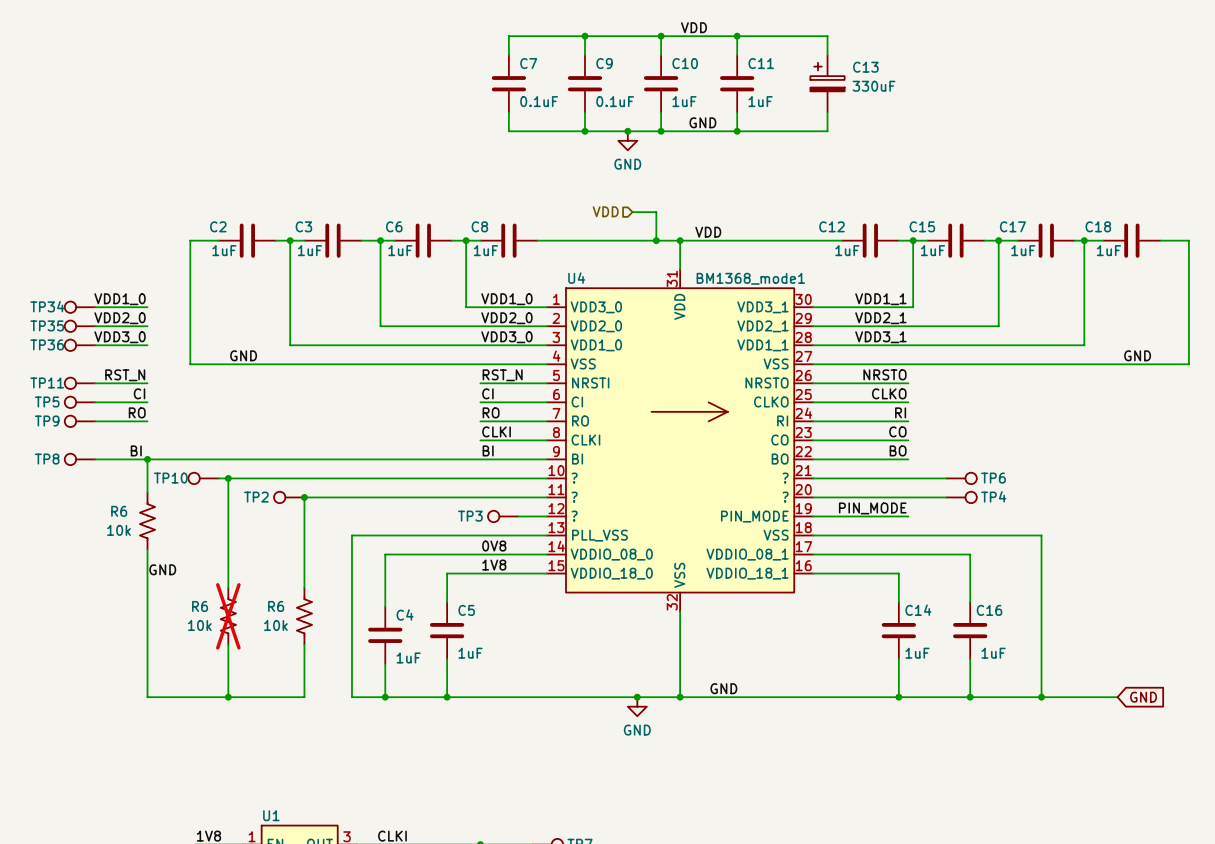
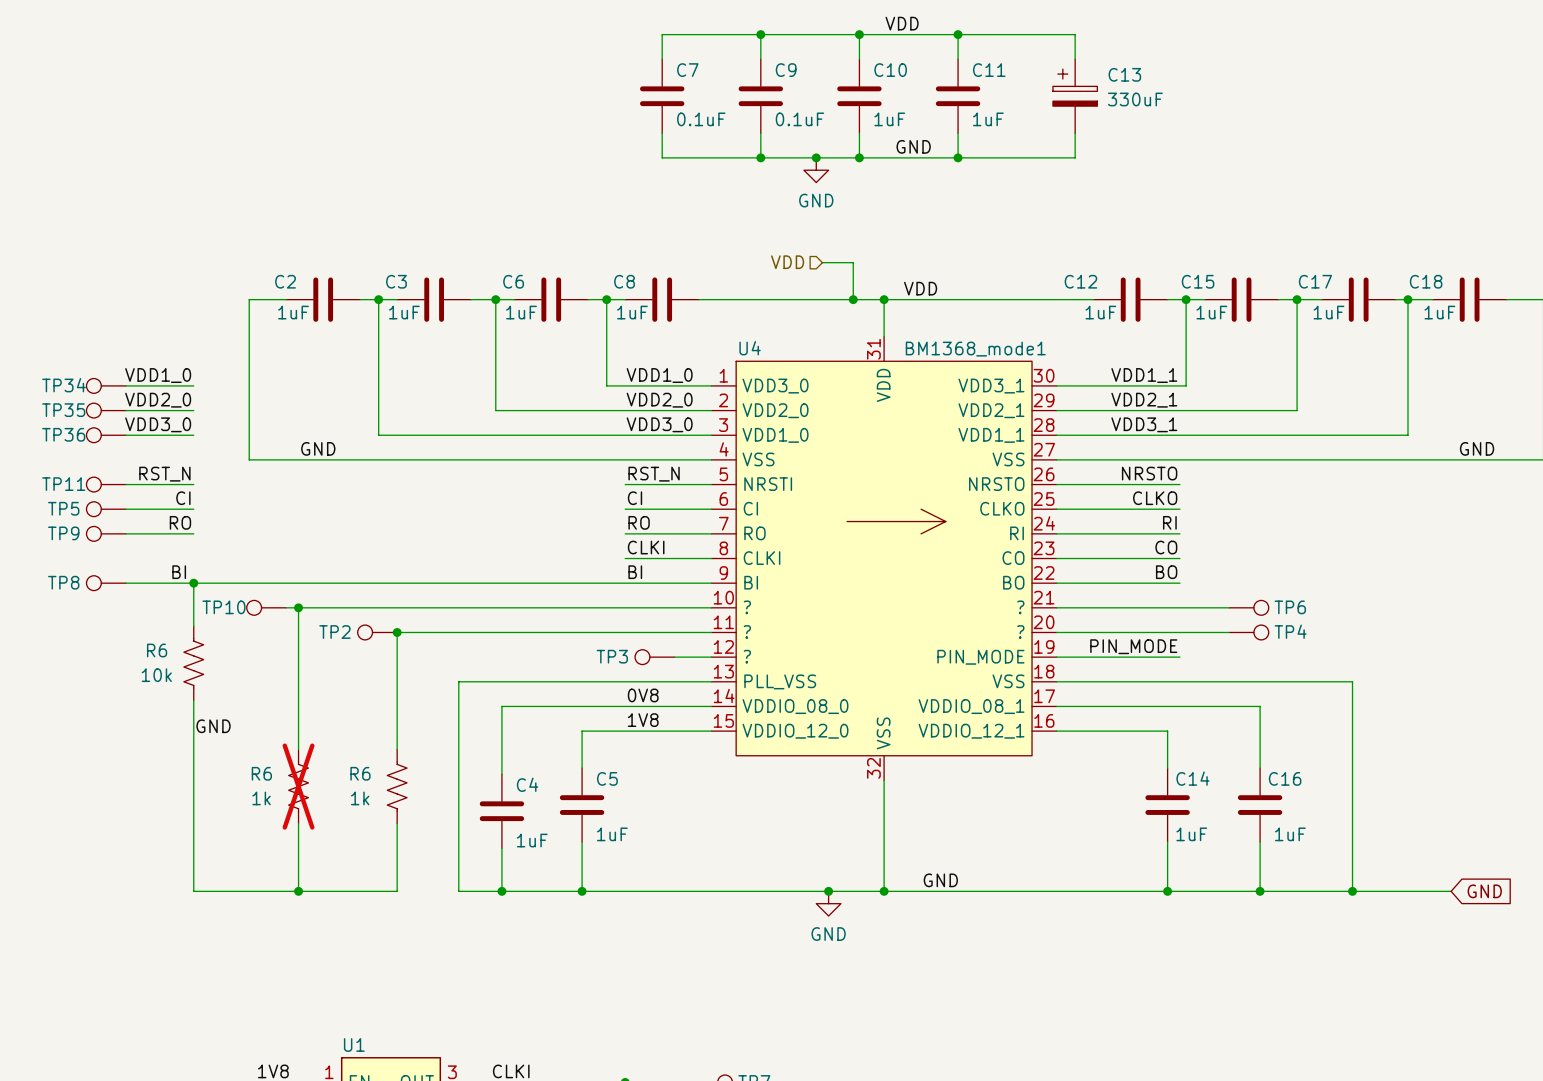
U4 pin name: VDDIO_18_0 (611, 573) -> VDDIO_12_0 (795, 731)
U4 pin name: VDDIO_18_1 (747, 573) -> VDDIO_12_1 (971, 731)
R6 value: 10k (199, 625) -> 1k (261, 798)
R6 value: 10k (275, 625) -> 1k (360, 798)

